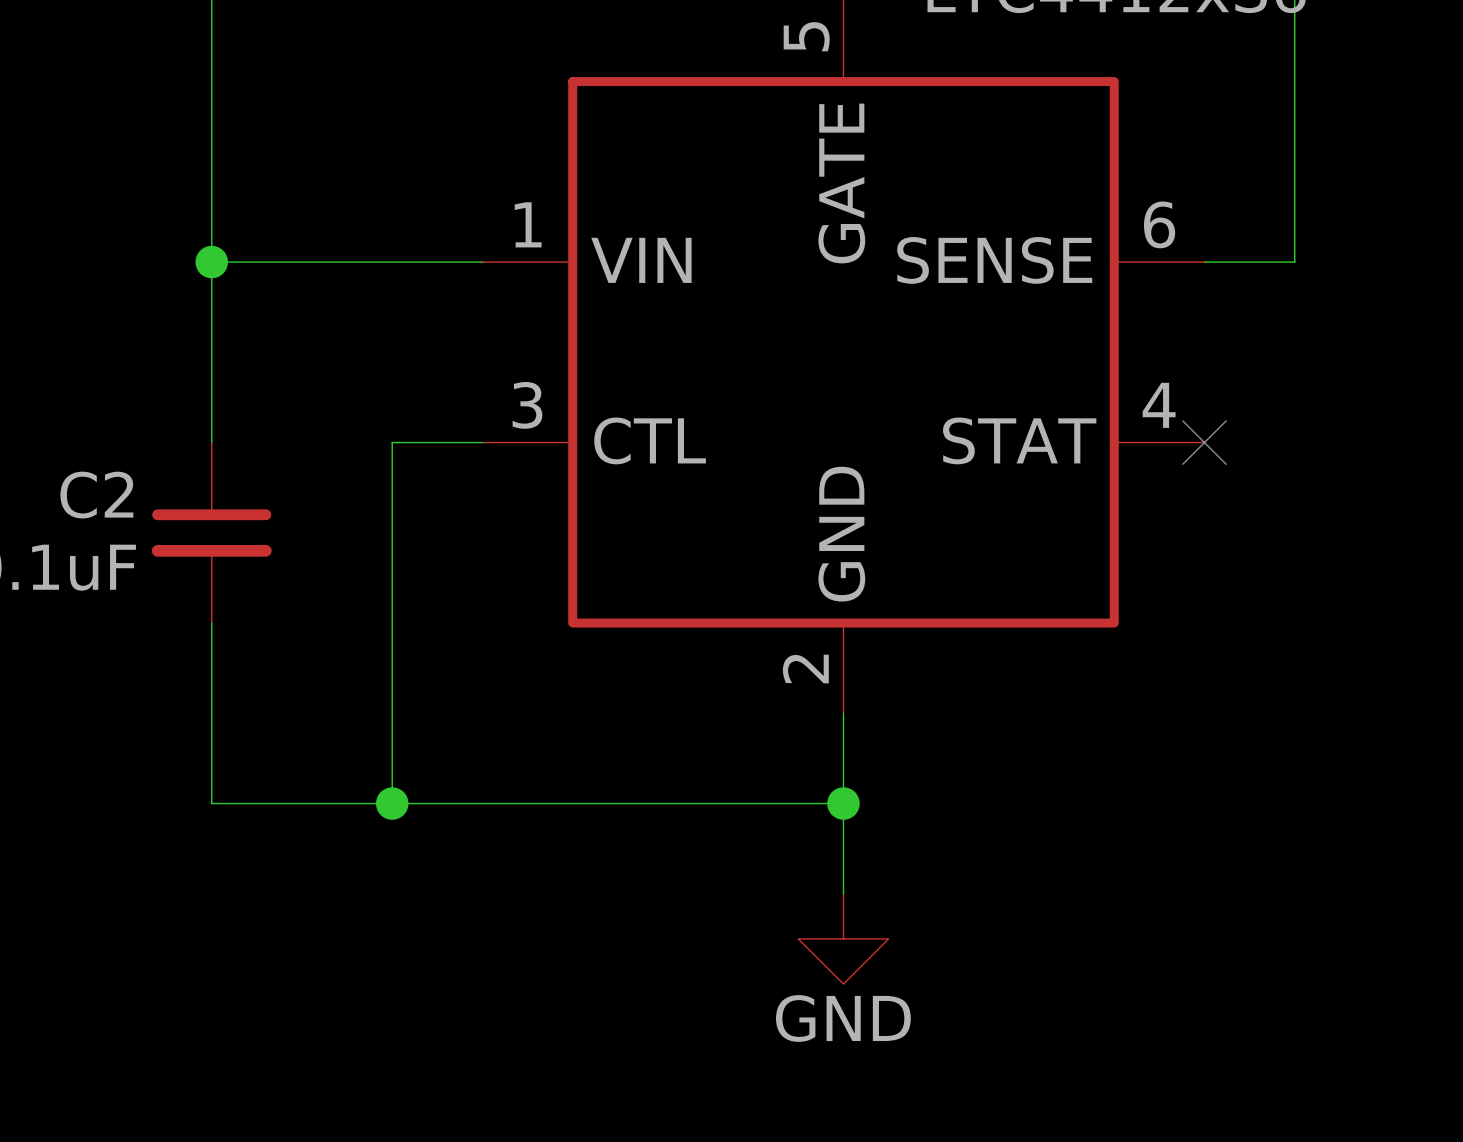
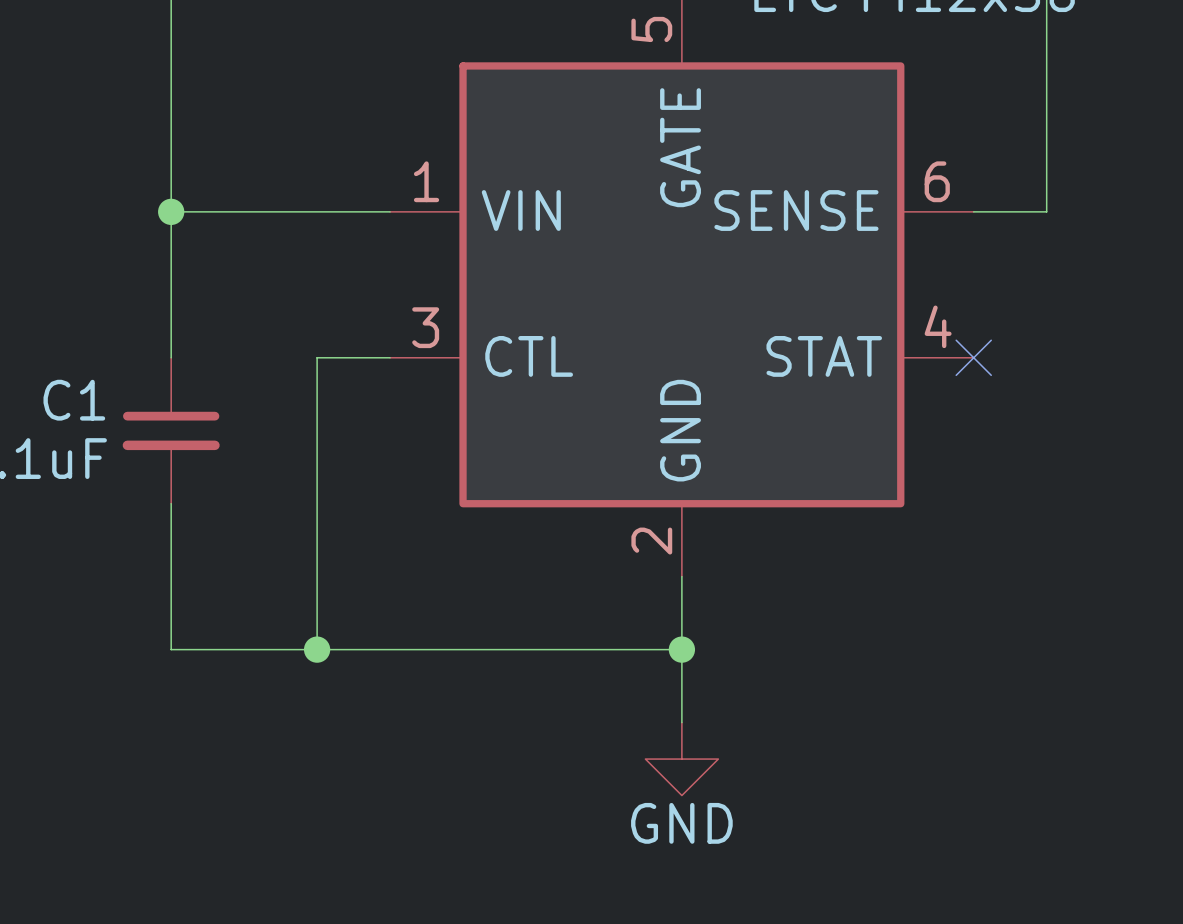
C2 name: C2 (96, 495) -> C1 (74, 400)

